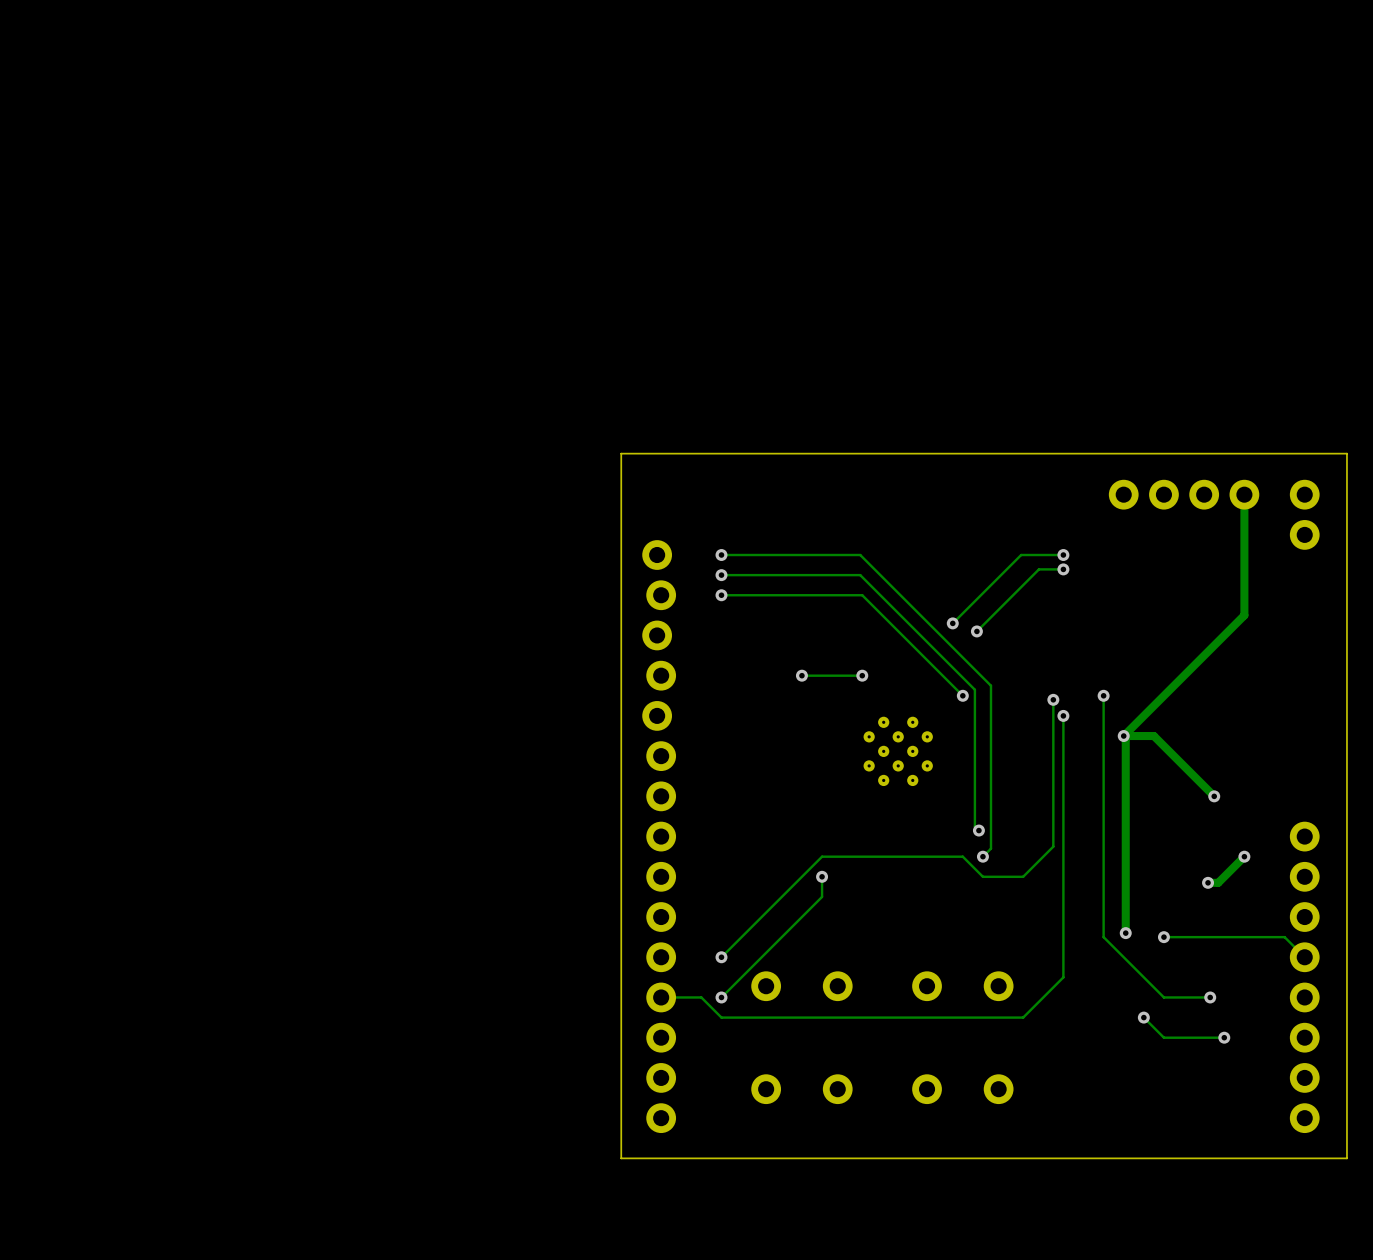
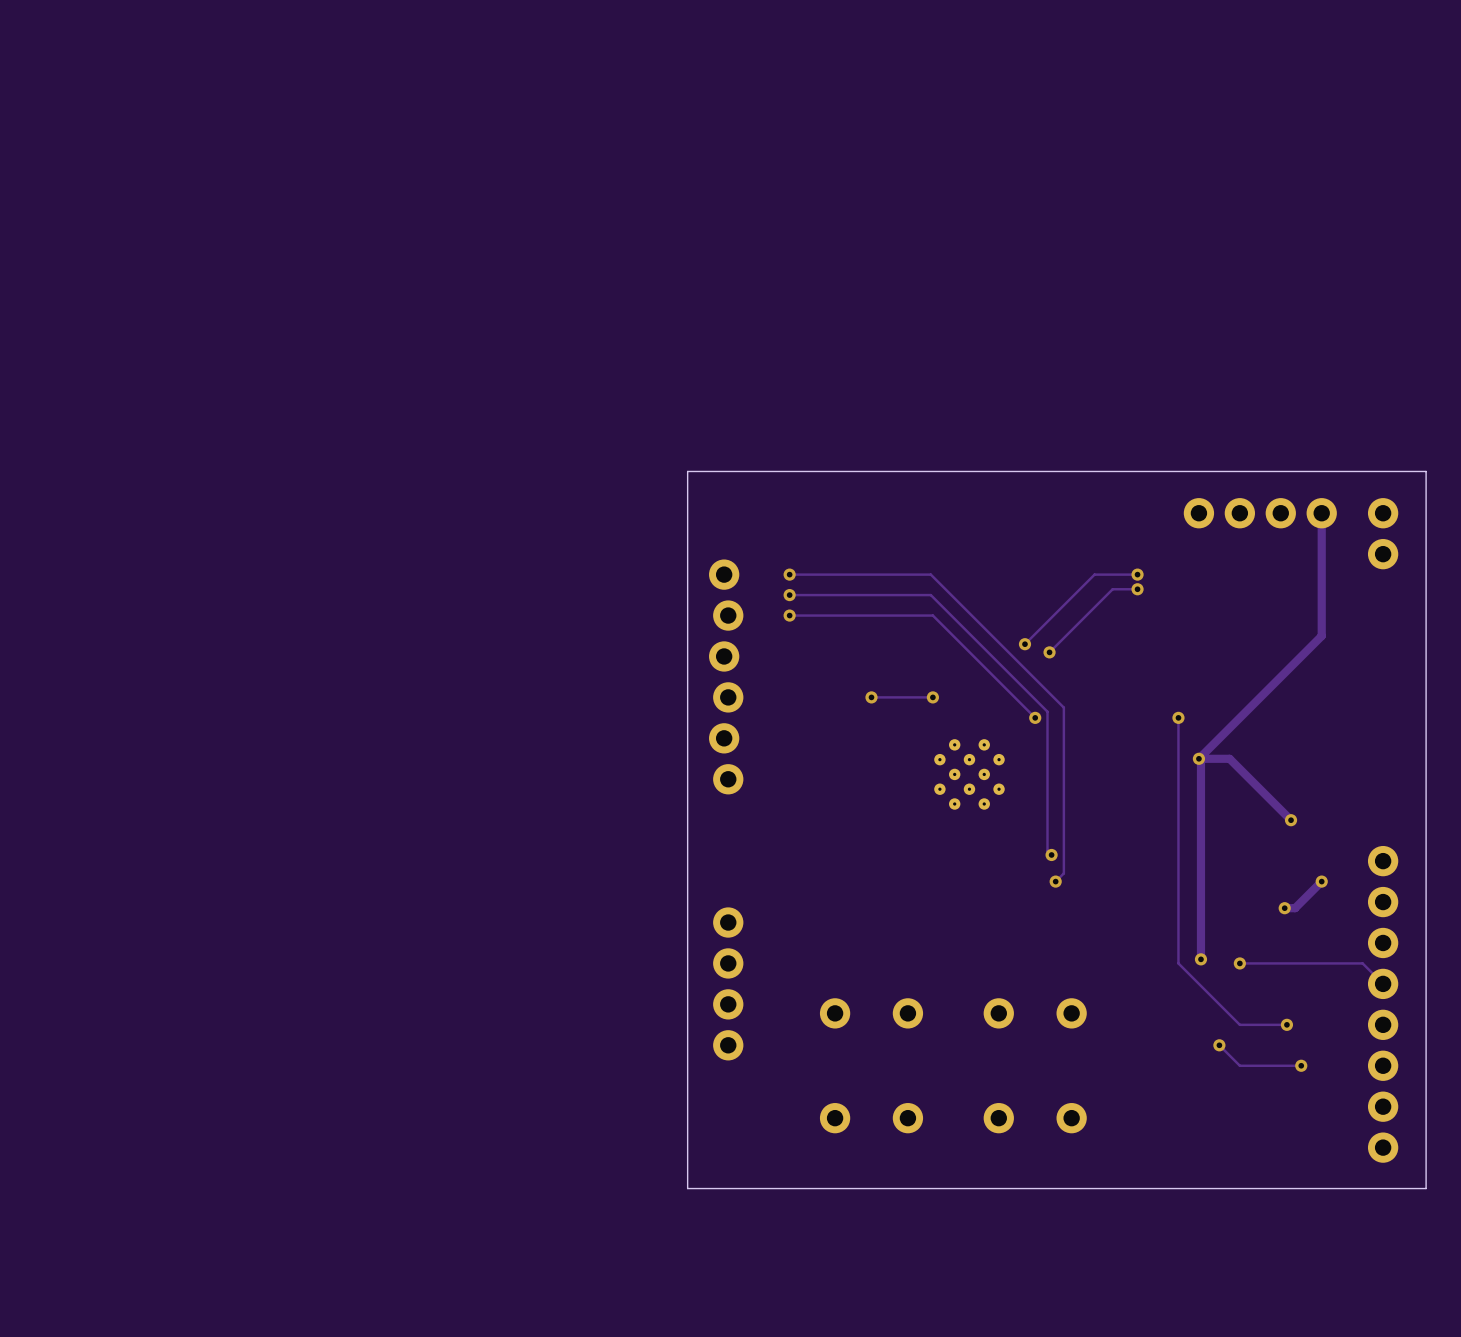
track: (1053, 699) (1053, 846) (1023, 876) (982, 876) (962, 856) (822, 856) (721, 957) -> none
via: (1053, 699) -> none
track: (1063, 715) (1063, 977) (1023, 1017) (721, 1017) (701, 997) (661, 997) -> none
via: (1063, 715) -> none
part position: (661, 856) -> (728, 983)
track: (822, 876) (822, 896) (721, 997) -> none
via: (822, 876) -> none
via: (721, 957) -> none
via: (721, 997) -> none
part: (661, 1037) -> none

